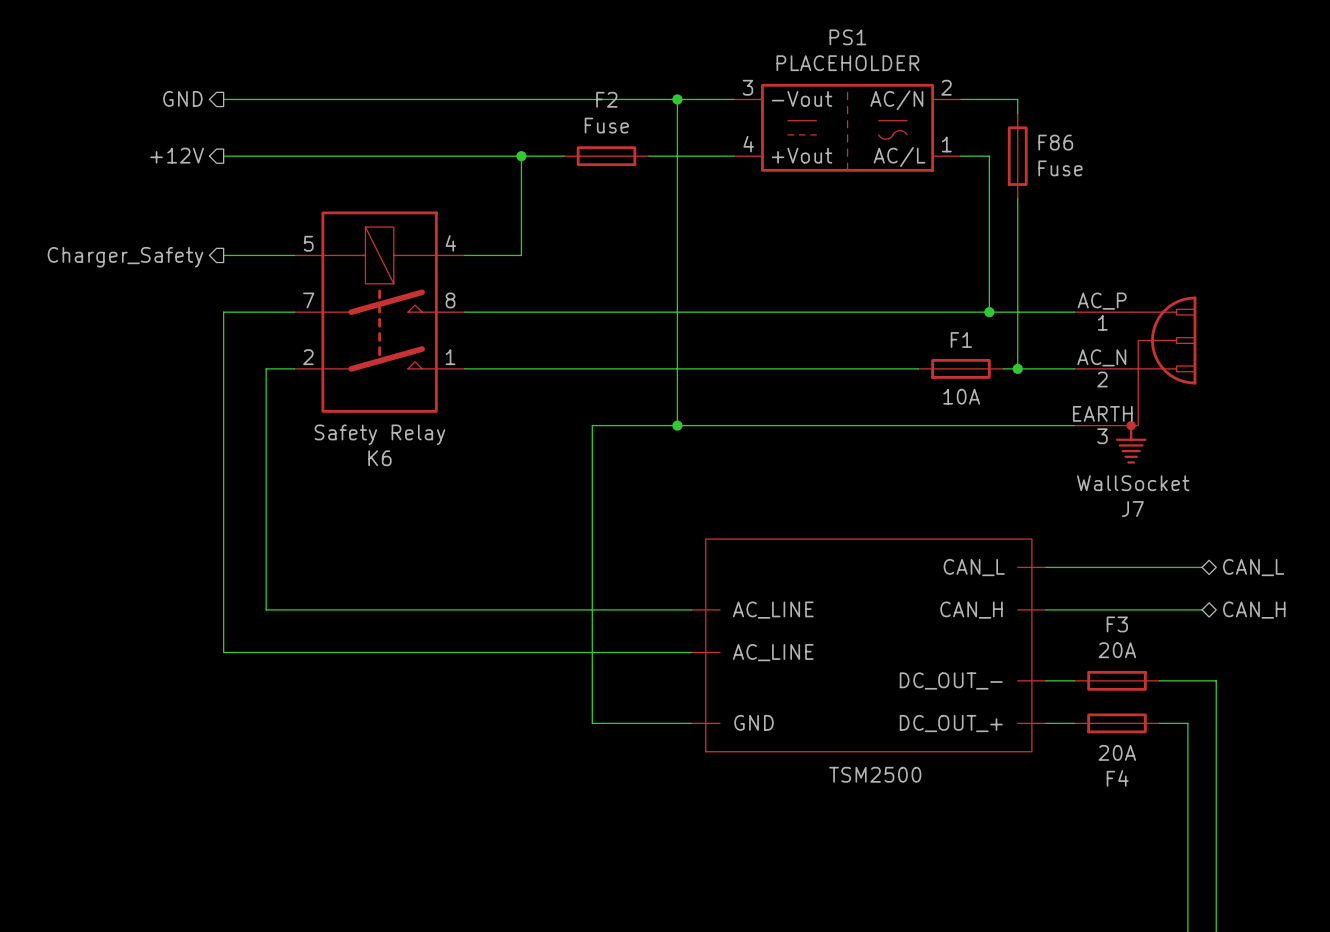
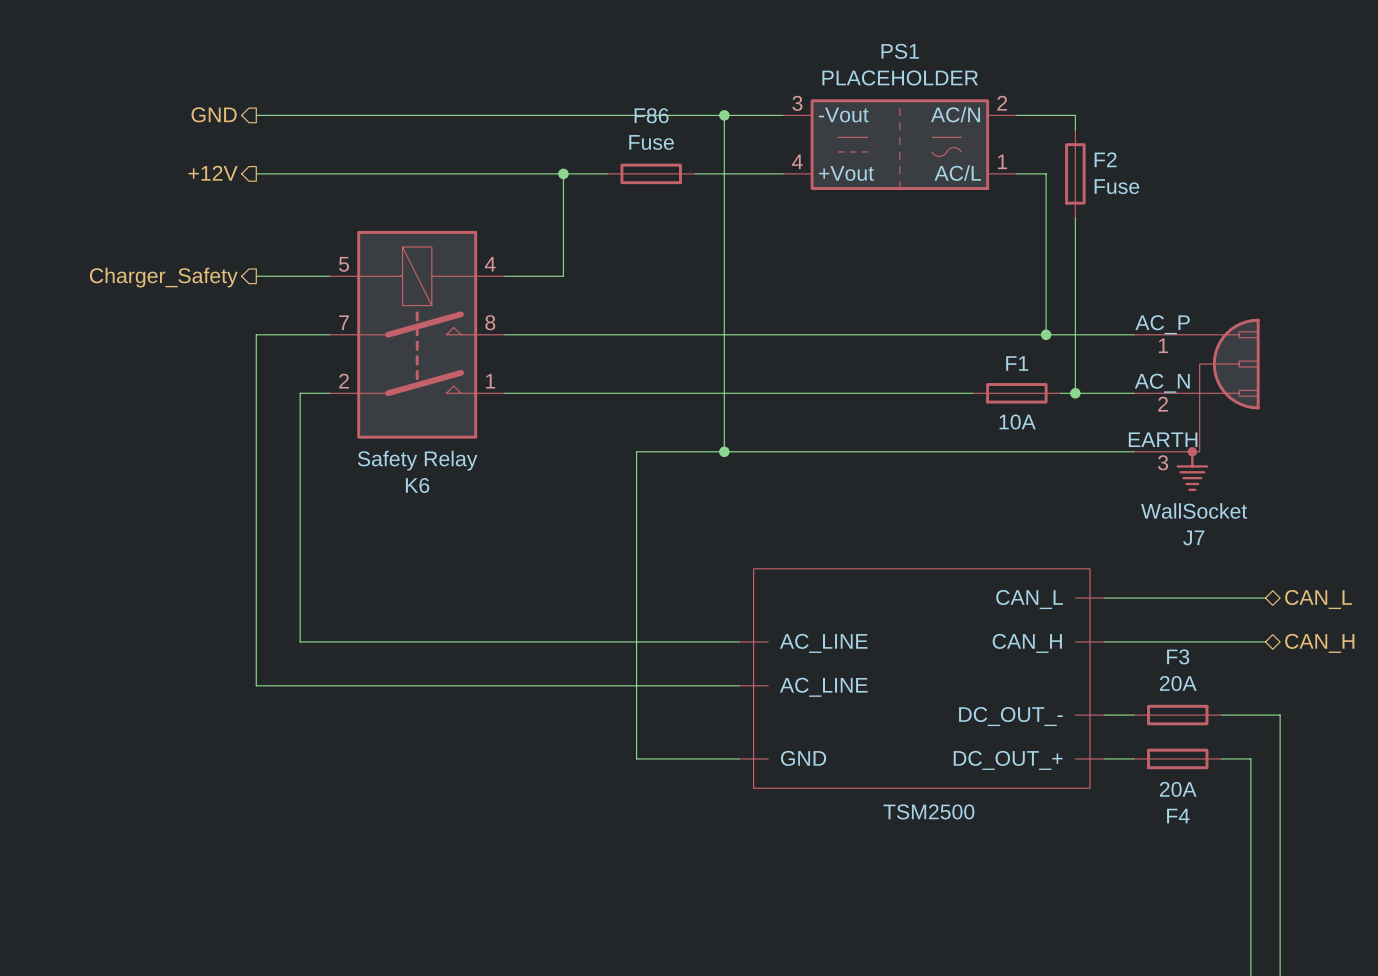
F2 name: F2 (606, 99) -> F86 (651, 115)
F86 name: F86 (1055, 142) -> F2 (1105, 159)

